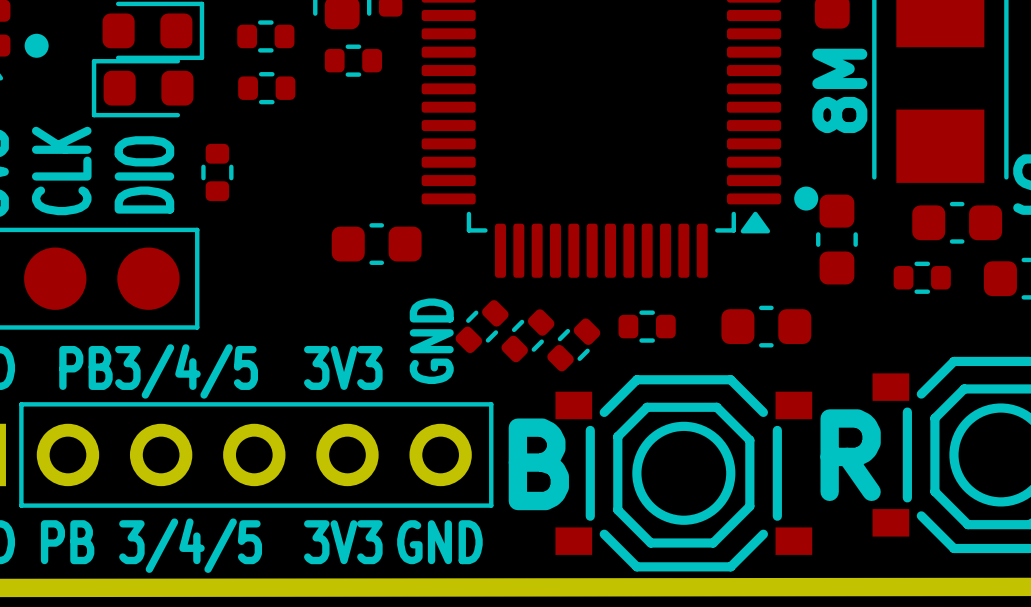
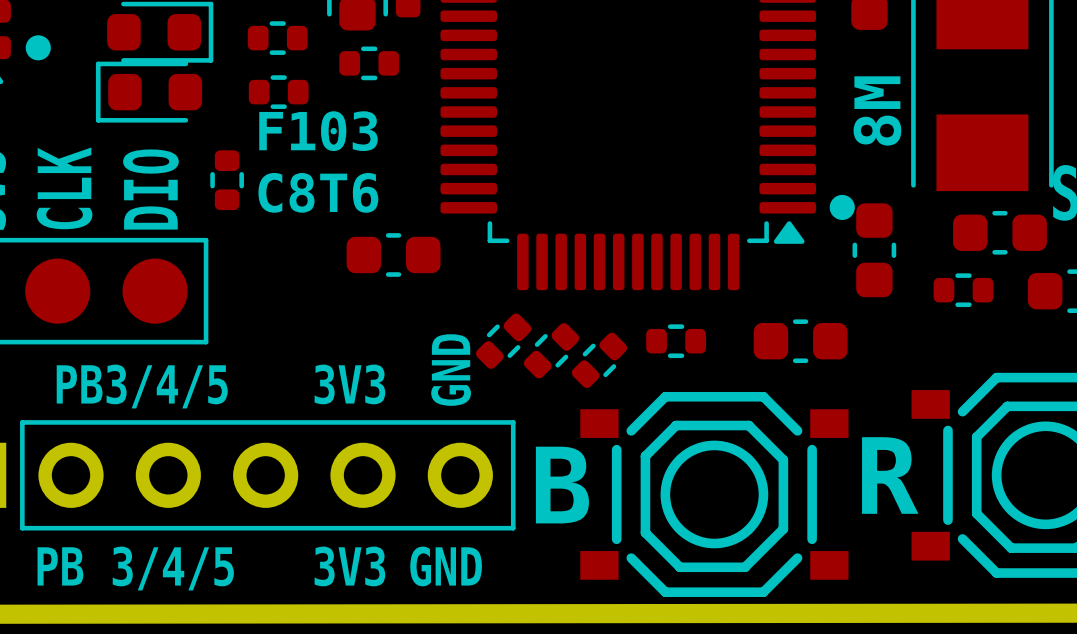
text: none -> F103 (318, 131)
text: none -> C8T6 (318, 192)

